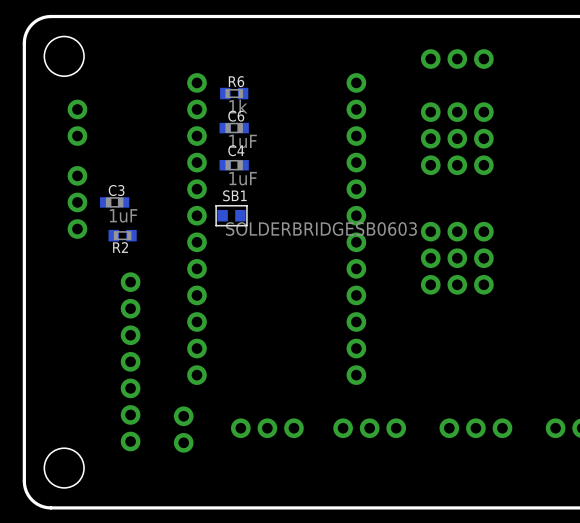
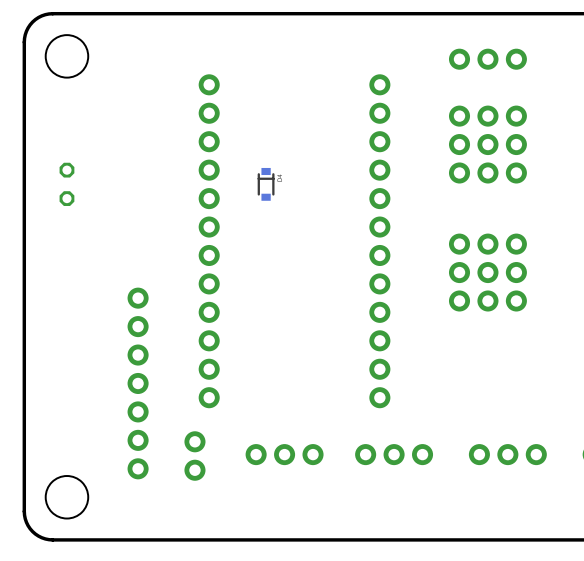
R6: 1k (234, 93) -> none
part: (77, 122) -> none
C6: 1uF (234, 128) -> none
C4: 1uF (234, 165) -> none
part: none -> (66, 184)
part: none -> (266, 184)
part: (77, 202) -> none
C3: 1uF (114, 202) -> none
SB1: SOLDERBRIDGESB0603 (231, 215) -> none
R2: (122, 235) -> none

